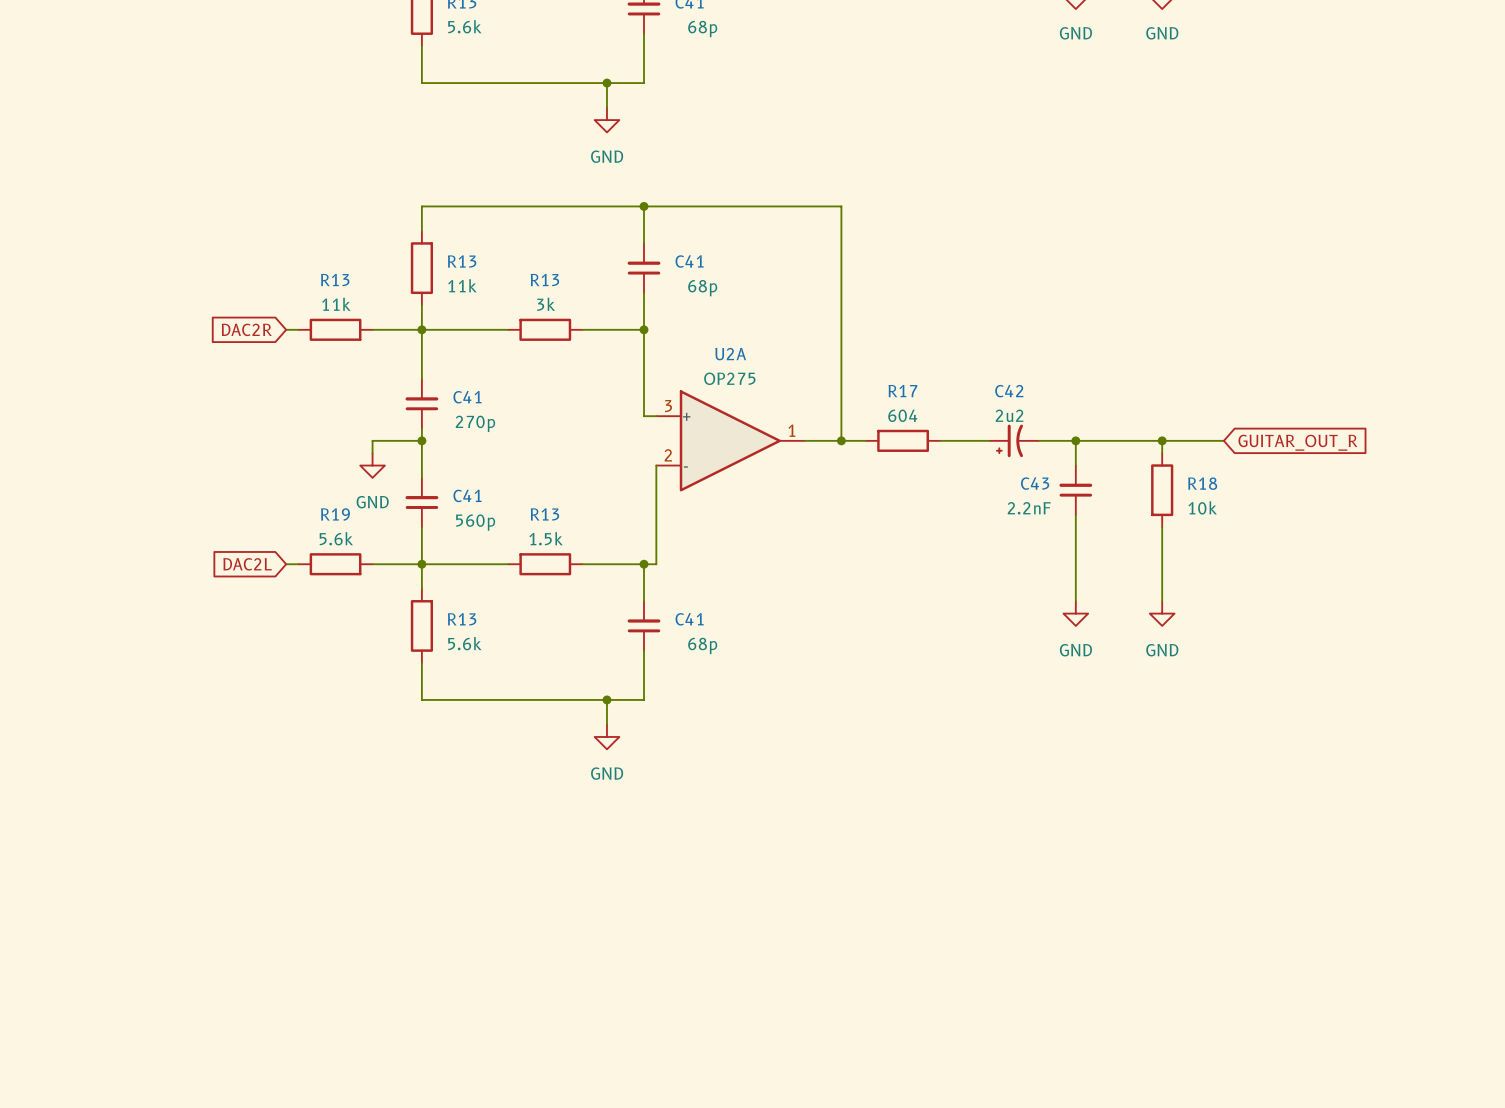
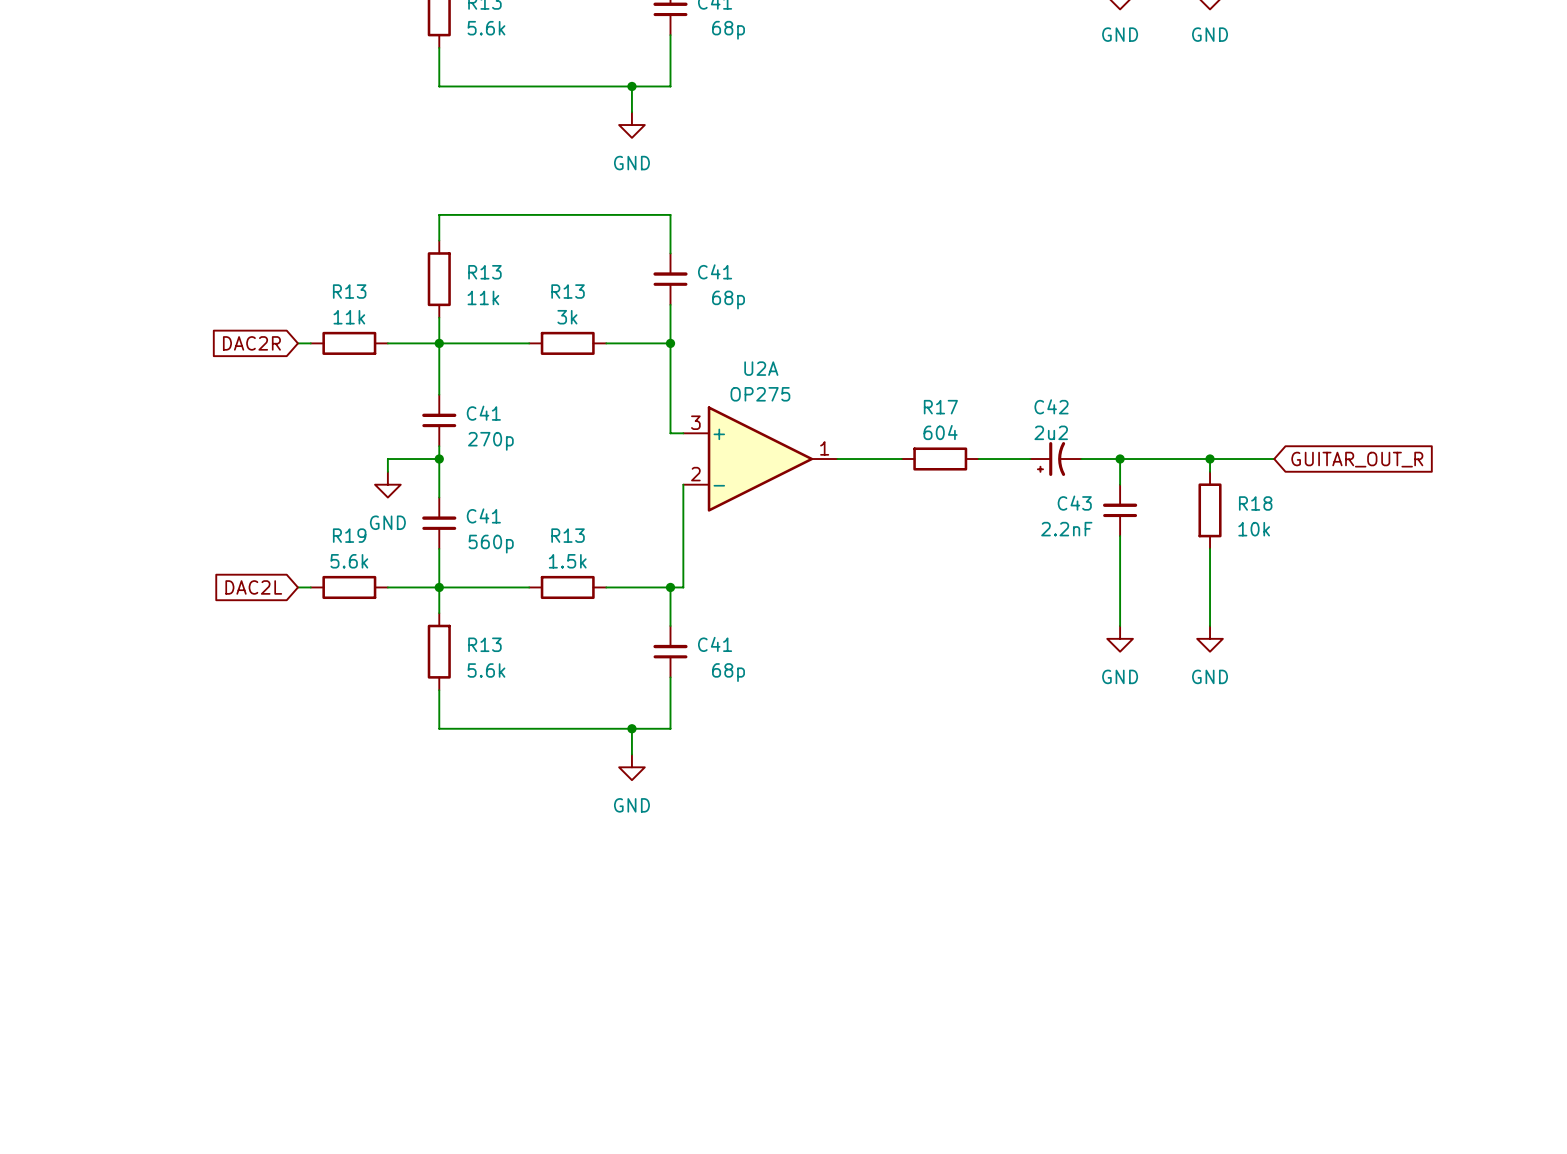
wire: (643, 206) (841, 206) (841, 440) -> none
junction: (643, 206) -> none
junction: (841, 440) -> none

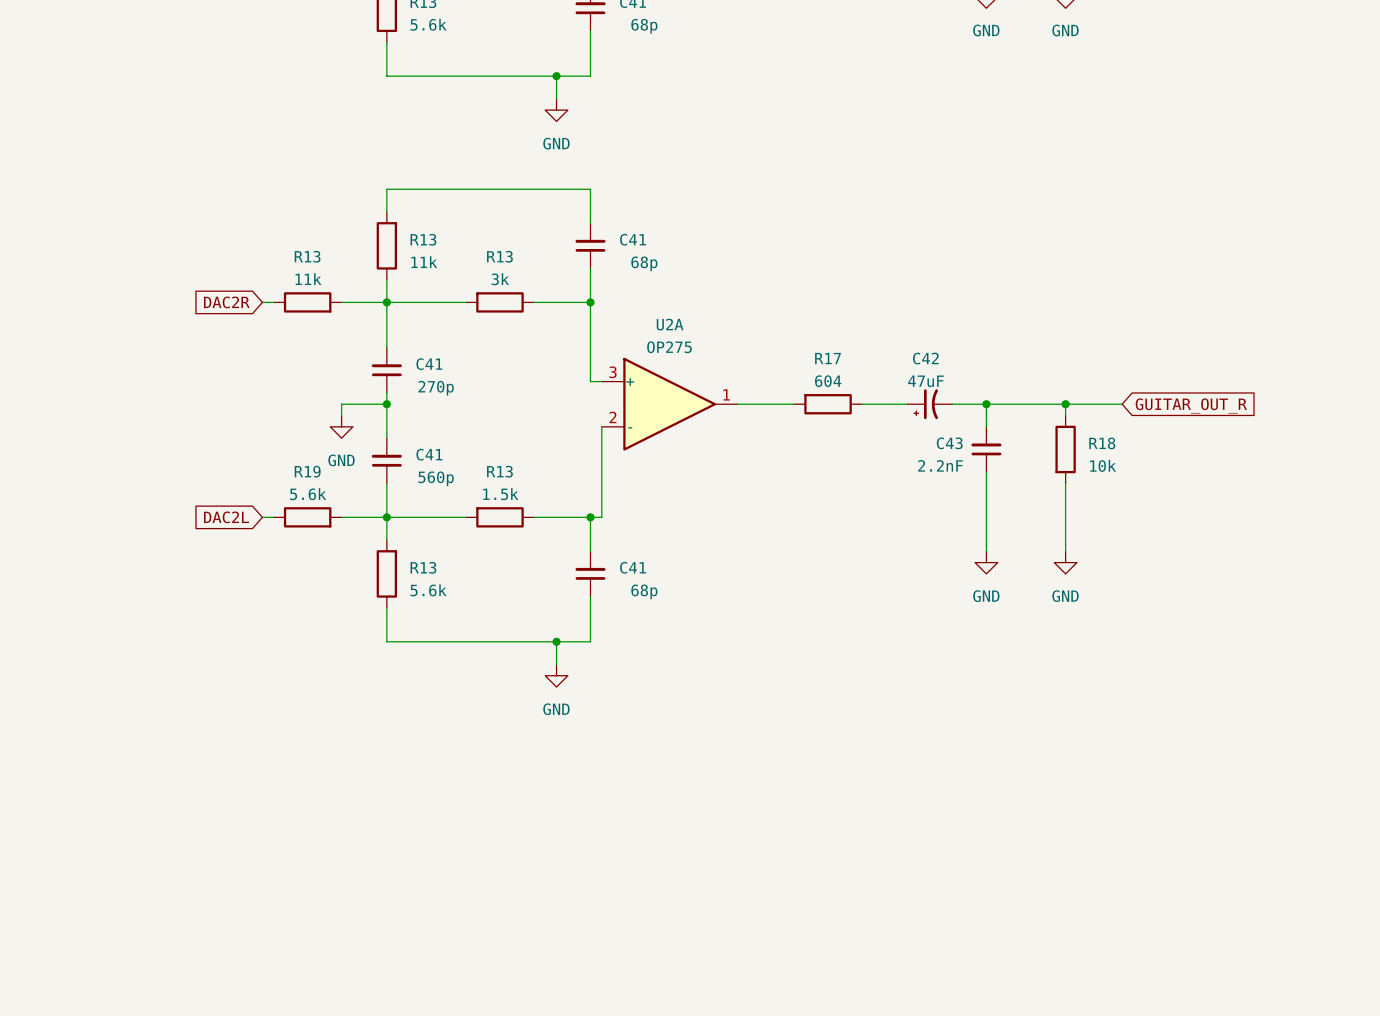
C42 value: 2u2 (1051, 432) -> 47uF (925, 381)

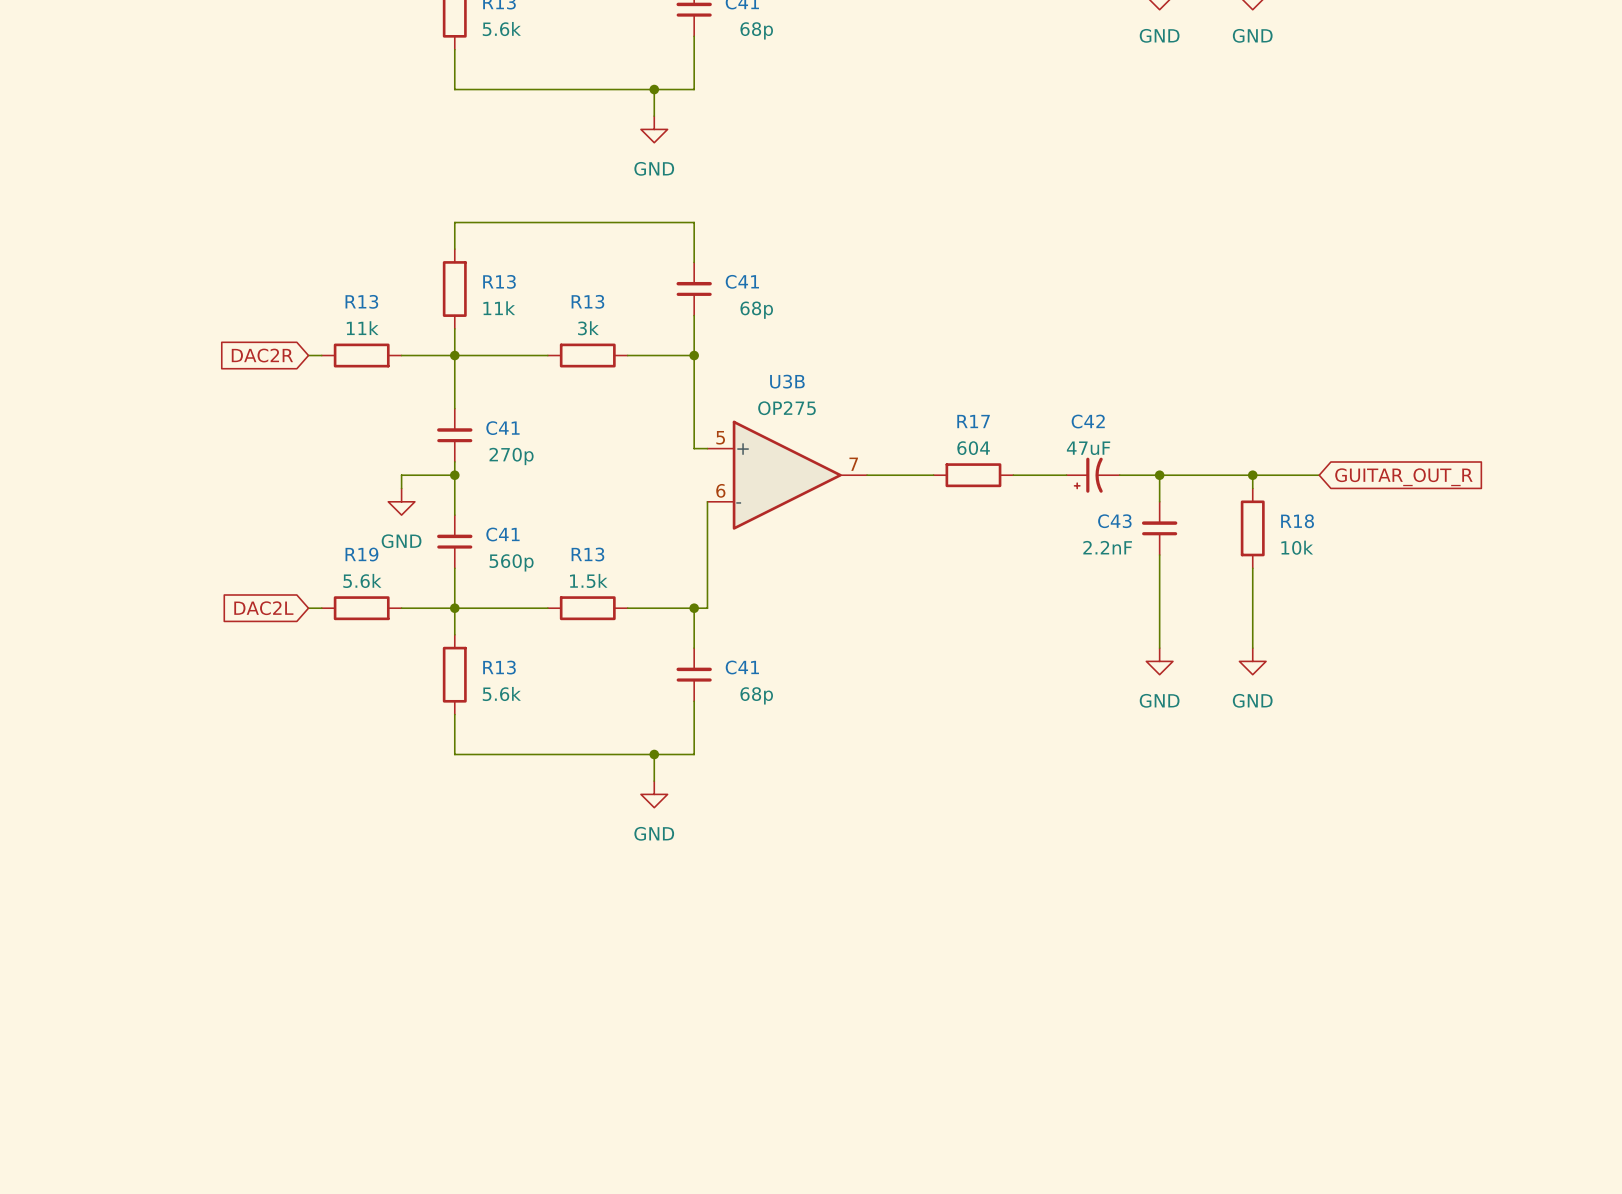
U2A name: U2A (670, 324) -> U3B (787, 381)
U2A pin number: 3 (613, 372) -> 5 (720, 437)
U2A pin number: 1 (726, 394) -> 7 (853, 464)
U2A pin number: 2 (613, 417) -> 6 (720, 490)

